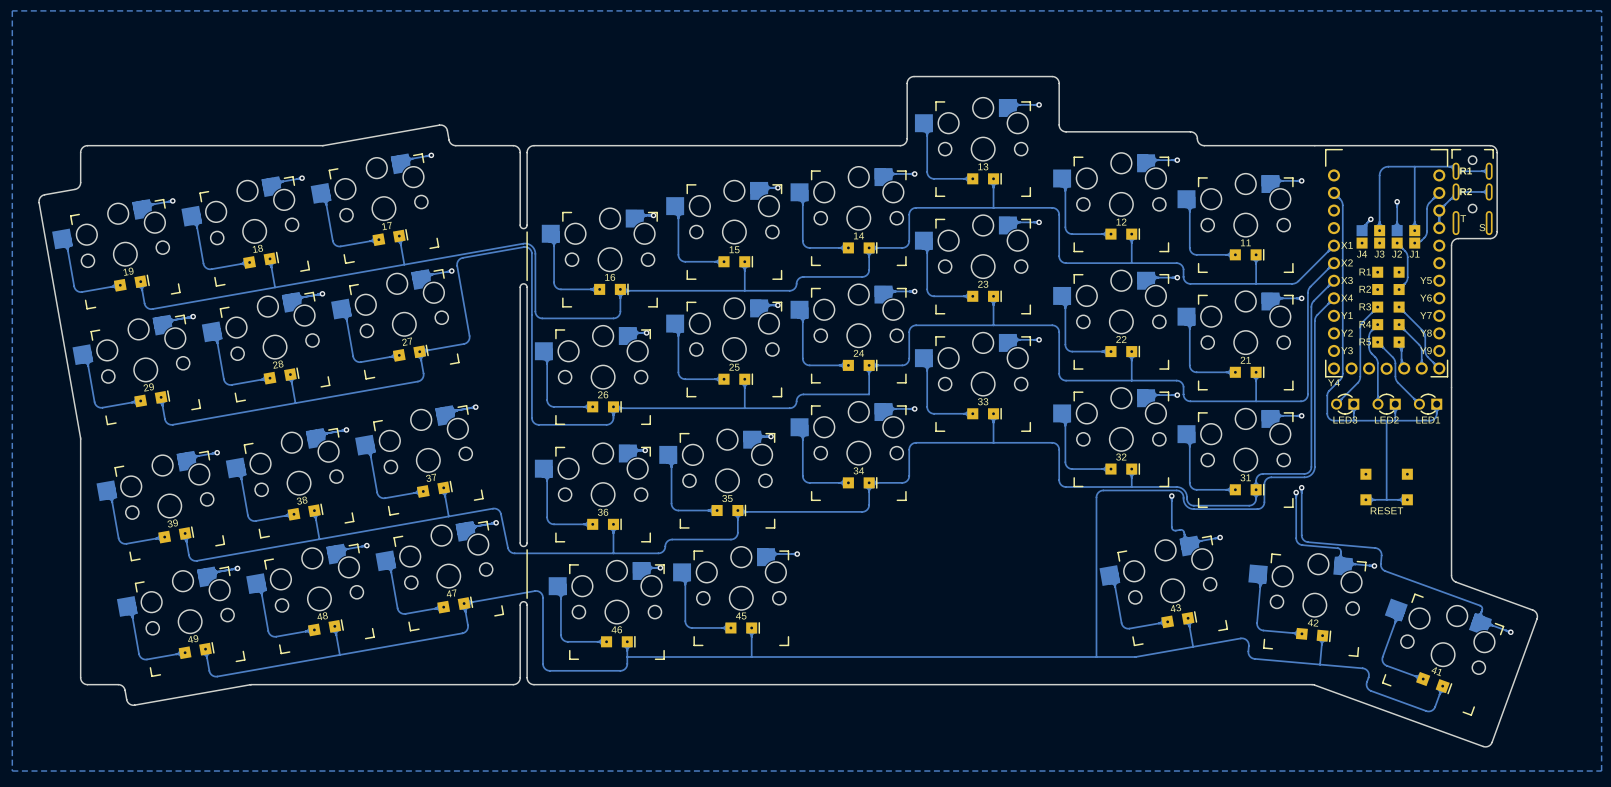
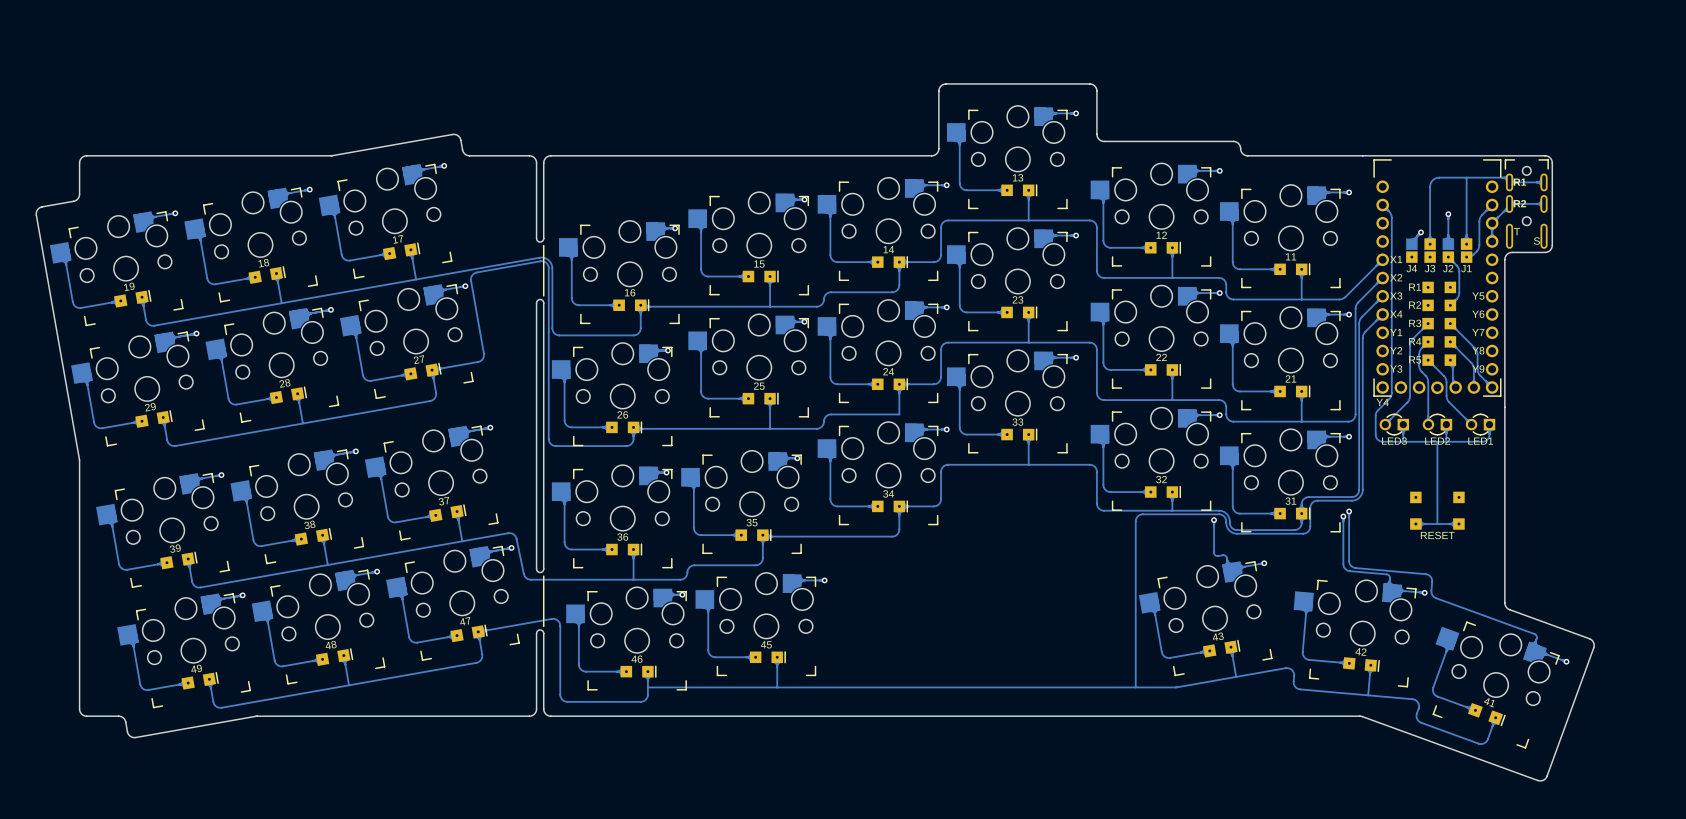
zone outline: (1601, 10) (12, 10) (12, 771) (1601, 771) (1601, 10) -> none

